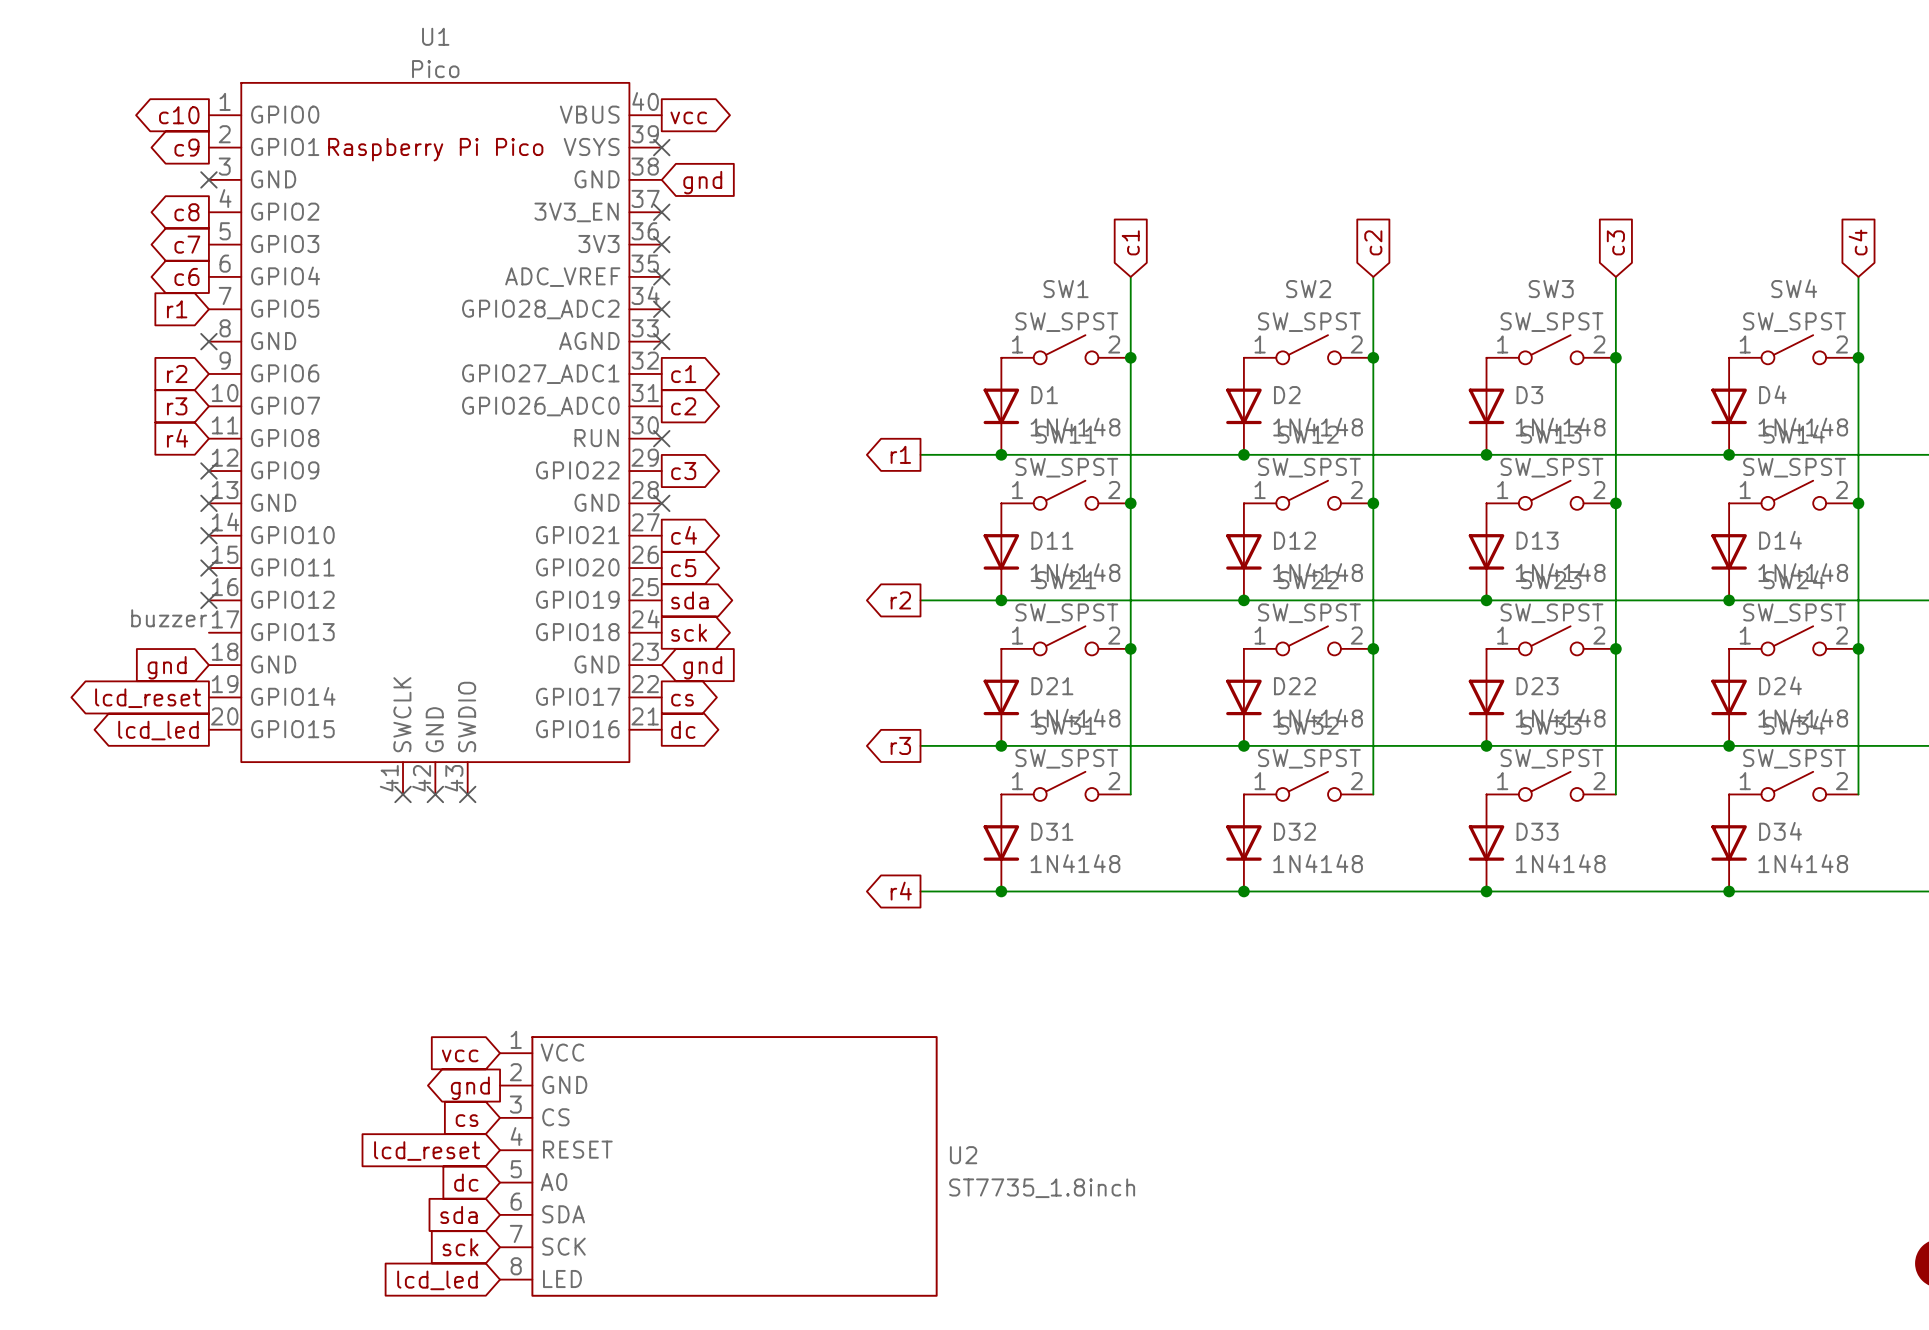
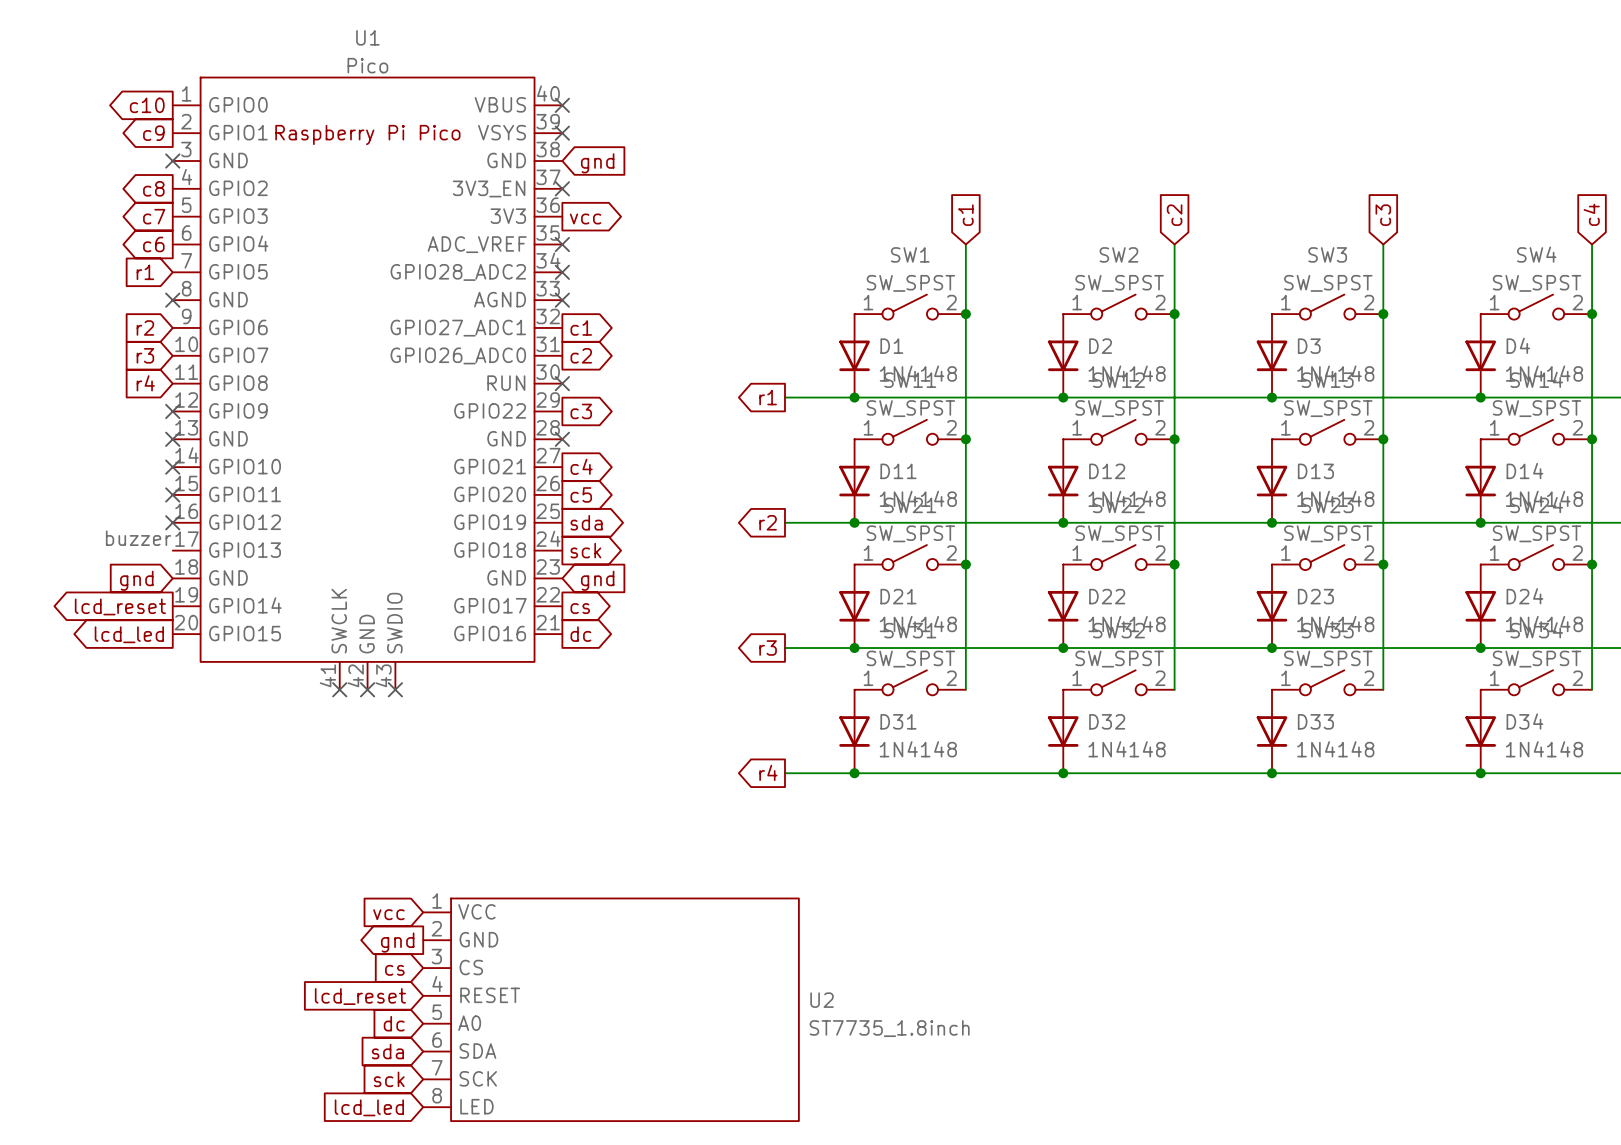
no-connect mark: none -> (562, 105)
global label position: vcc (688, 117) -> vcc (585, 218)
no-connect mark: (661, 244) -> none

